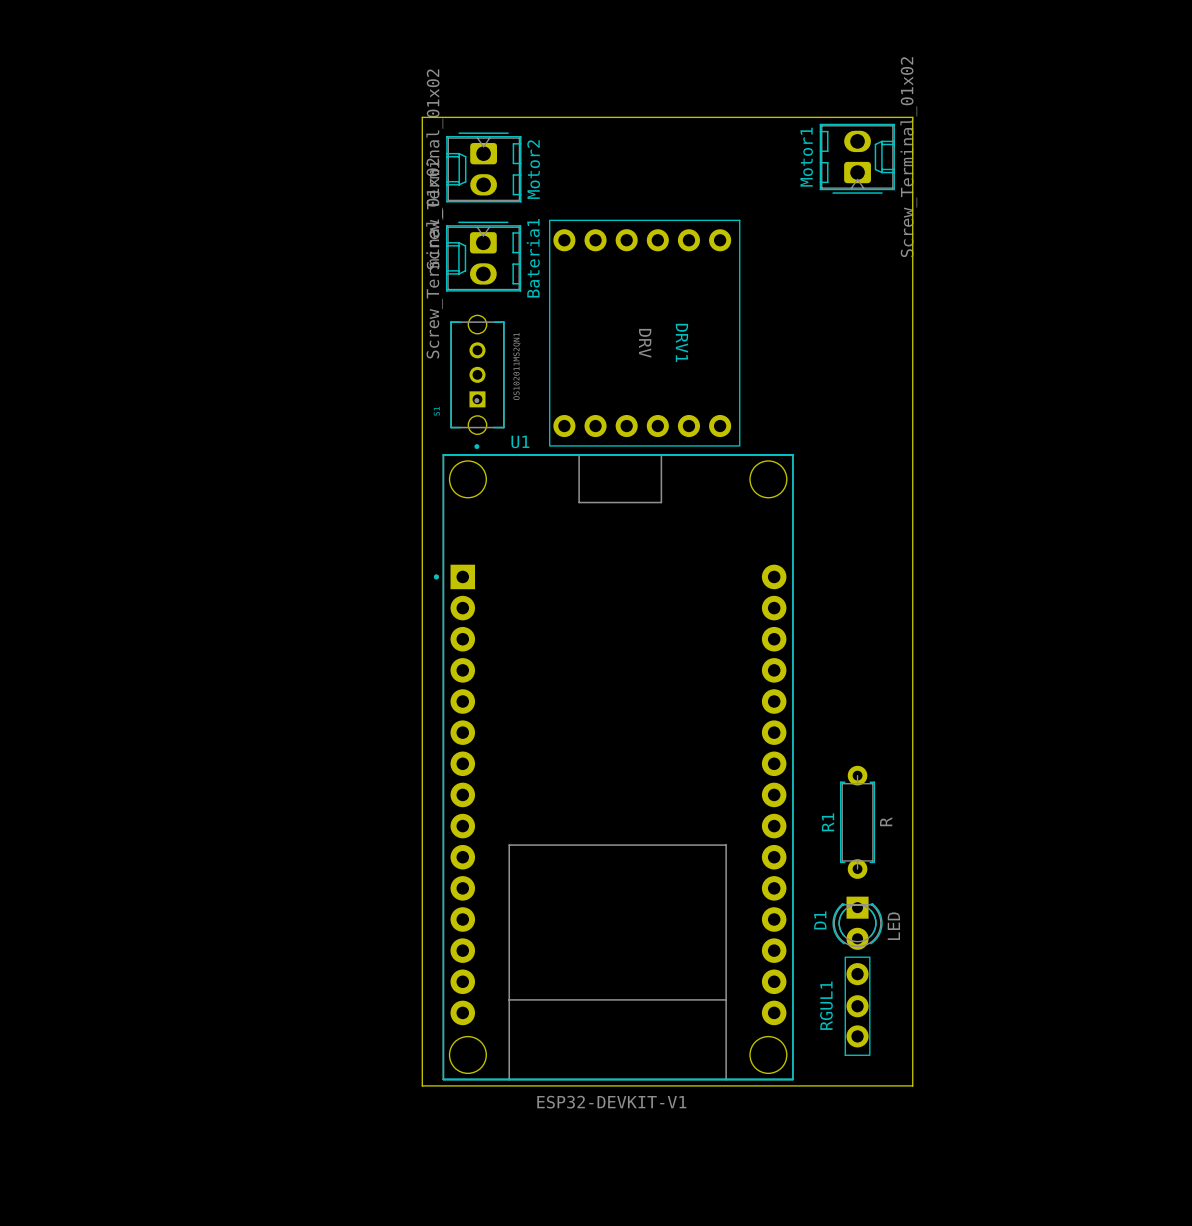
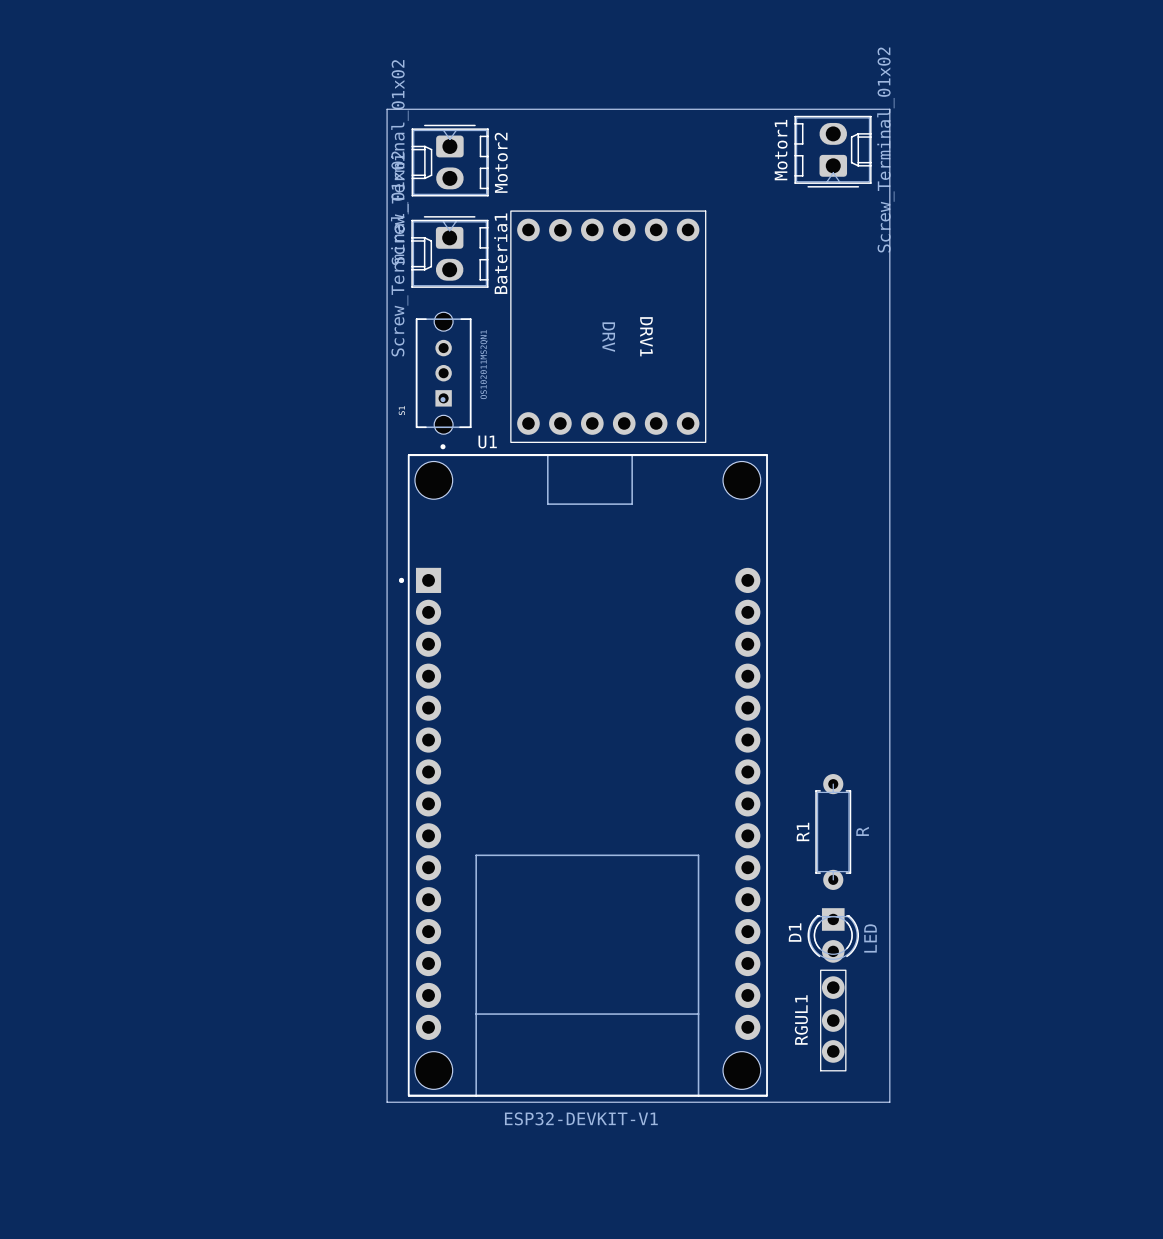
DRV1 footprint: [549, 219, 741, 447] -> [510, 210, 707, 443]

